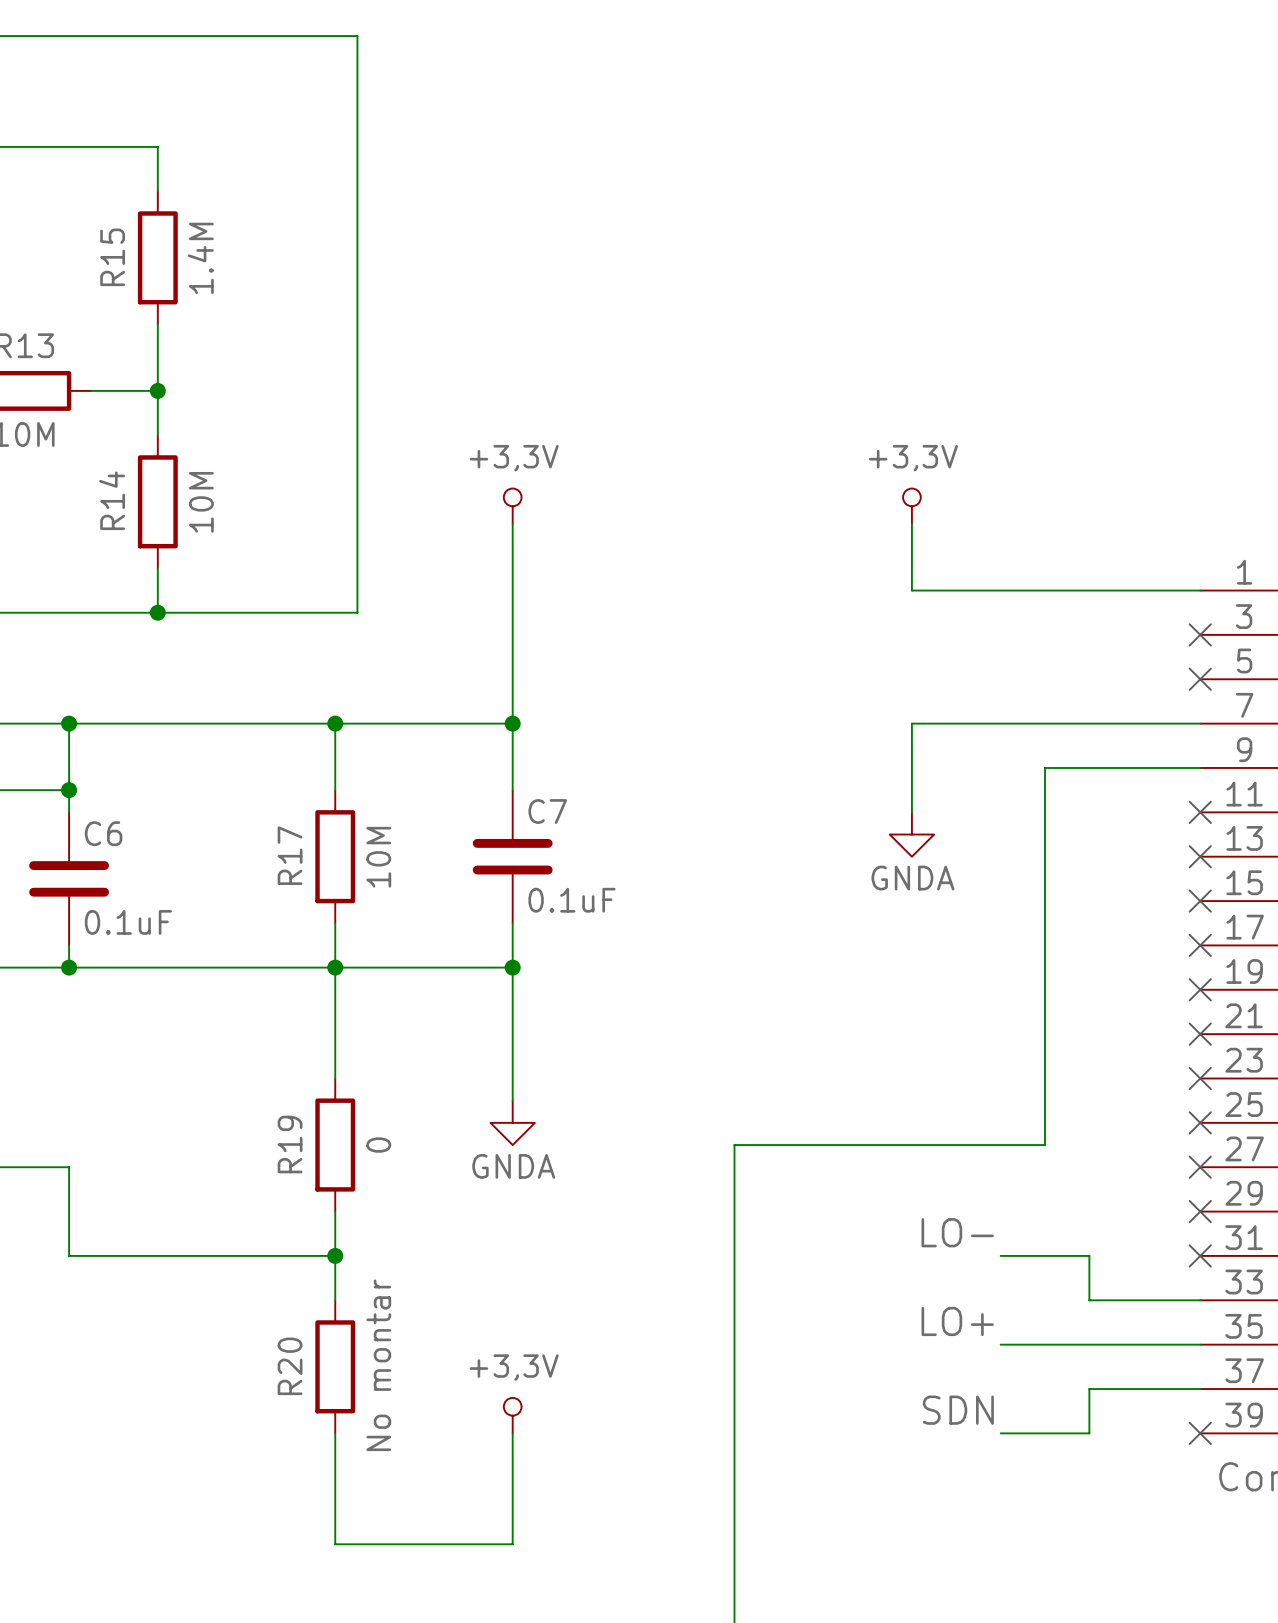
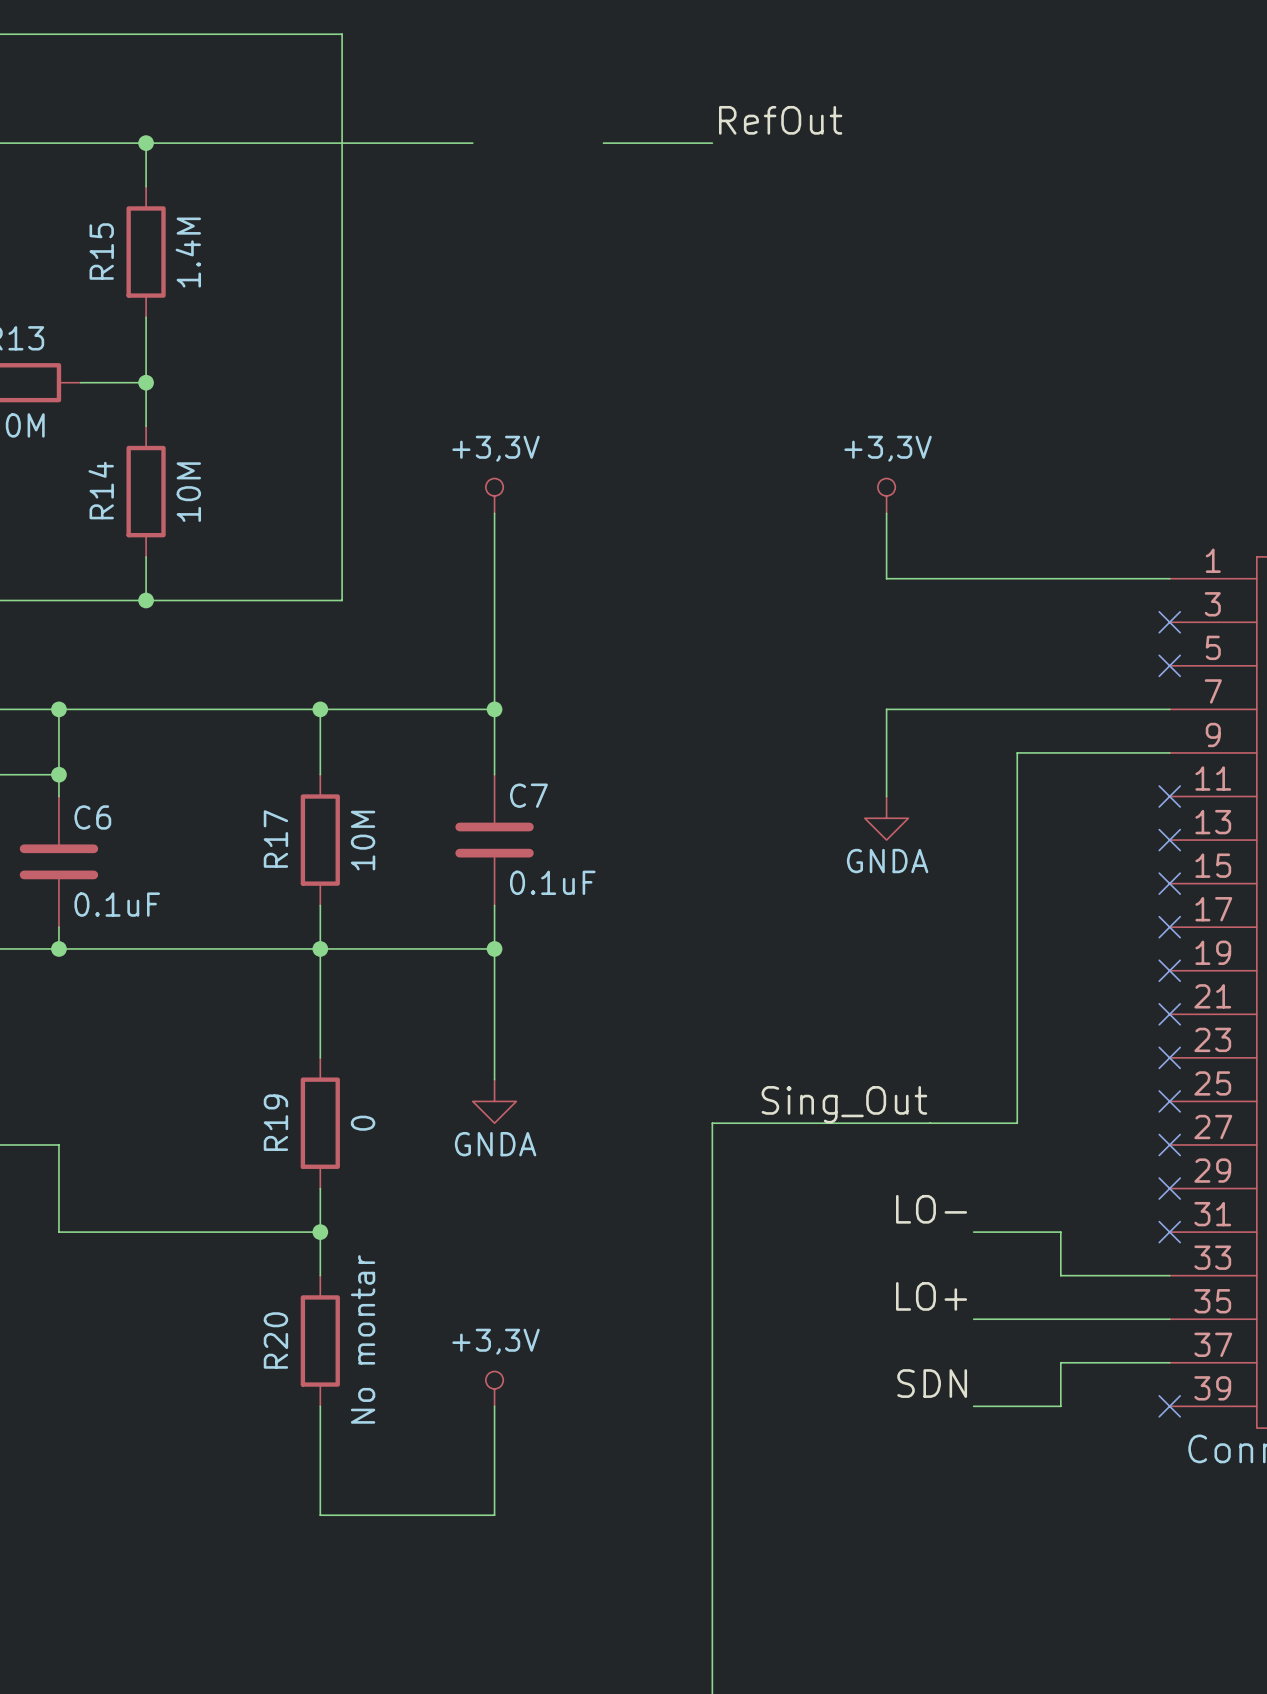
label: none -> RefOut (780, 120)
wire: none -> (146, 143) (472, 143)
junction: none -> (146, 143)
wire: none -> (603, 143) (712, 143)
label: none -> Sing_Out (844, 1104)

